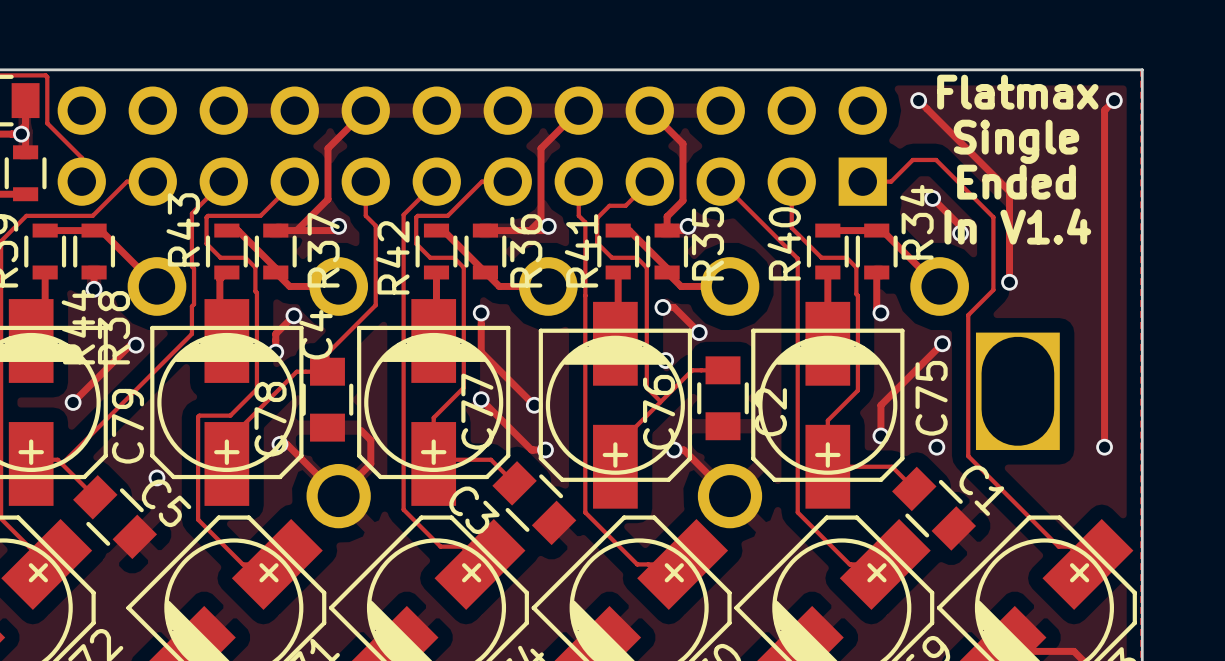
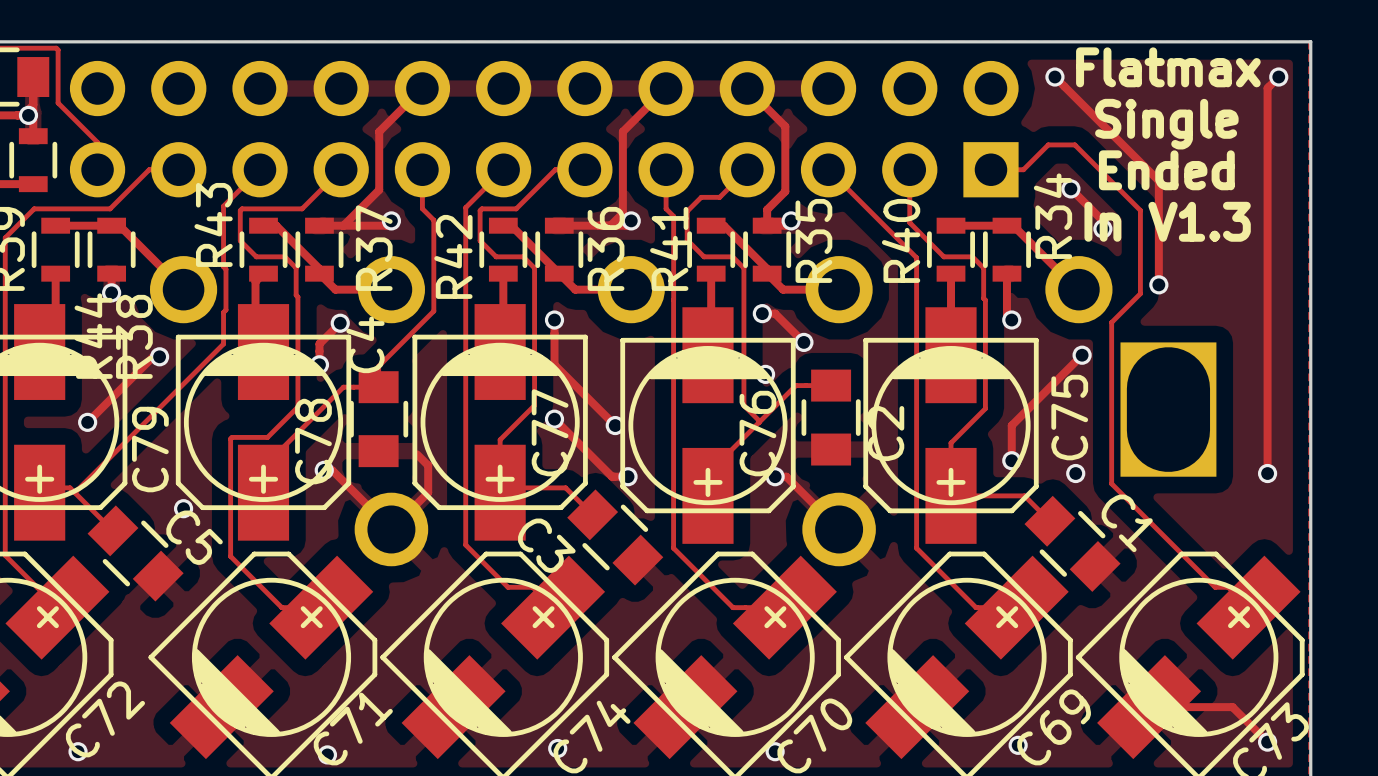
text: In V1.4 (1017, 226) -> In V1.3 (1167, 221)

